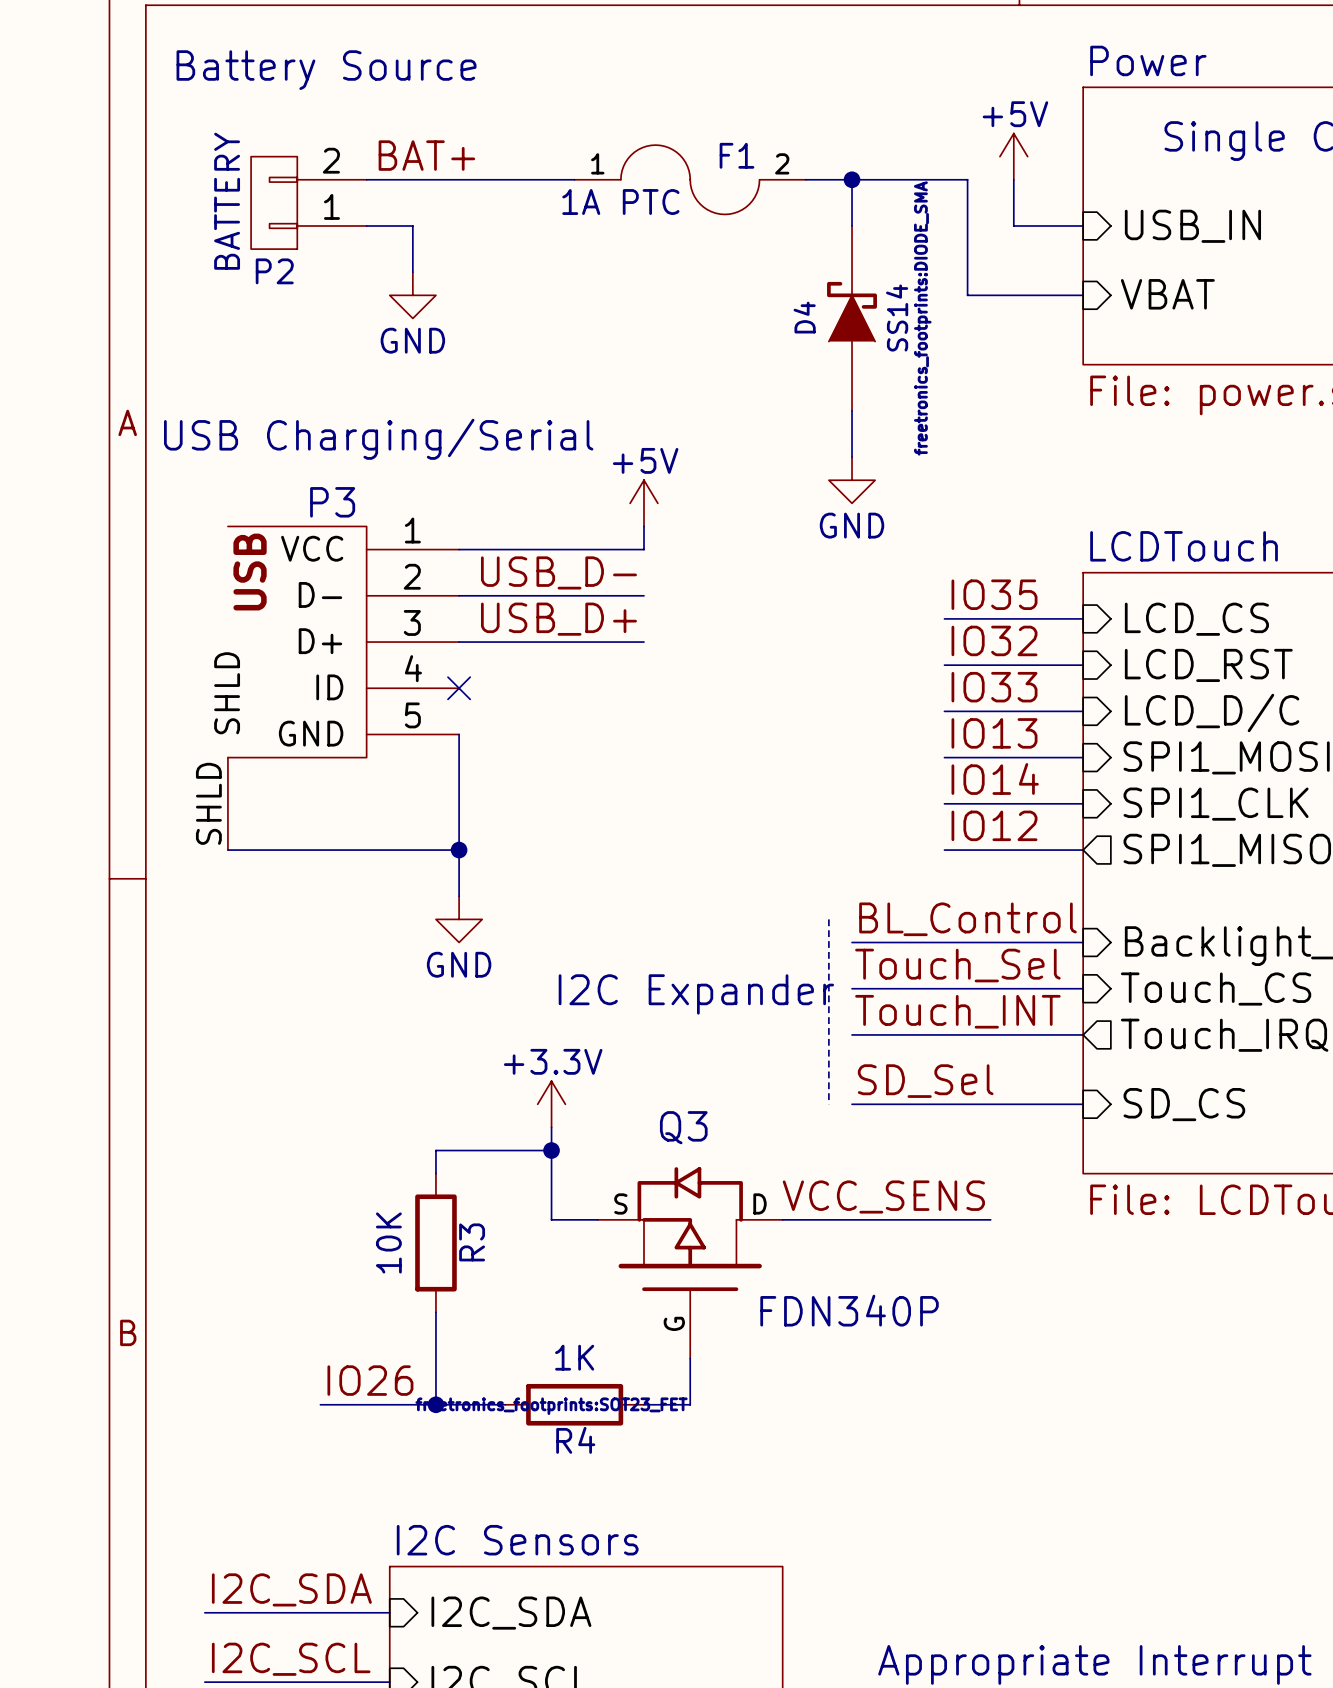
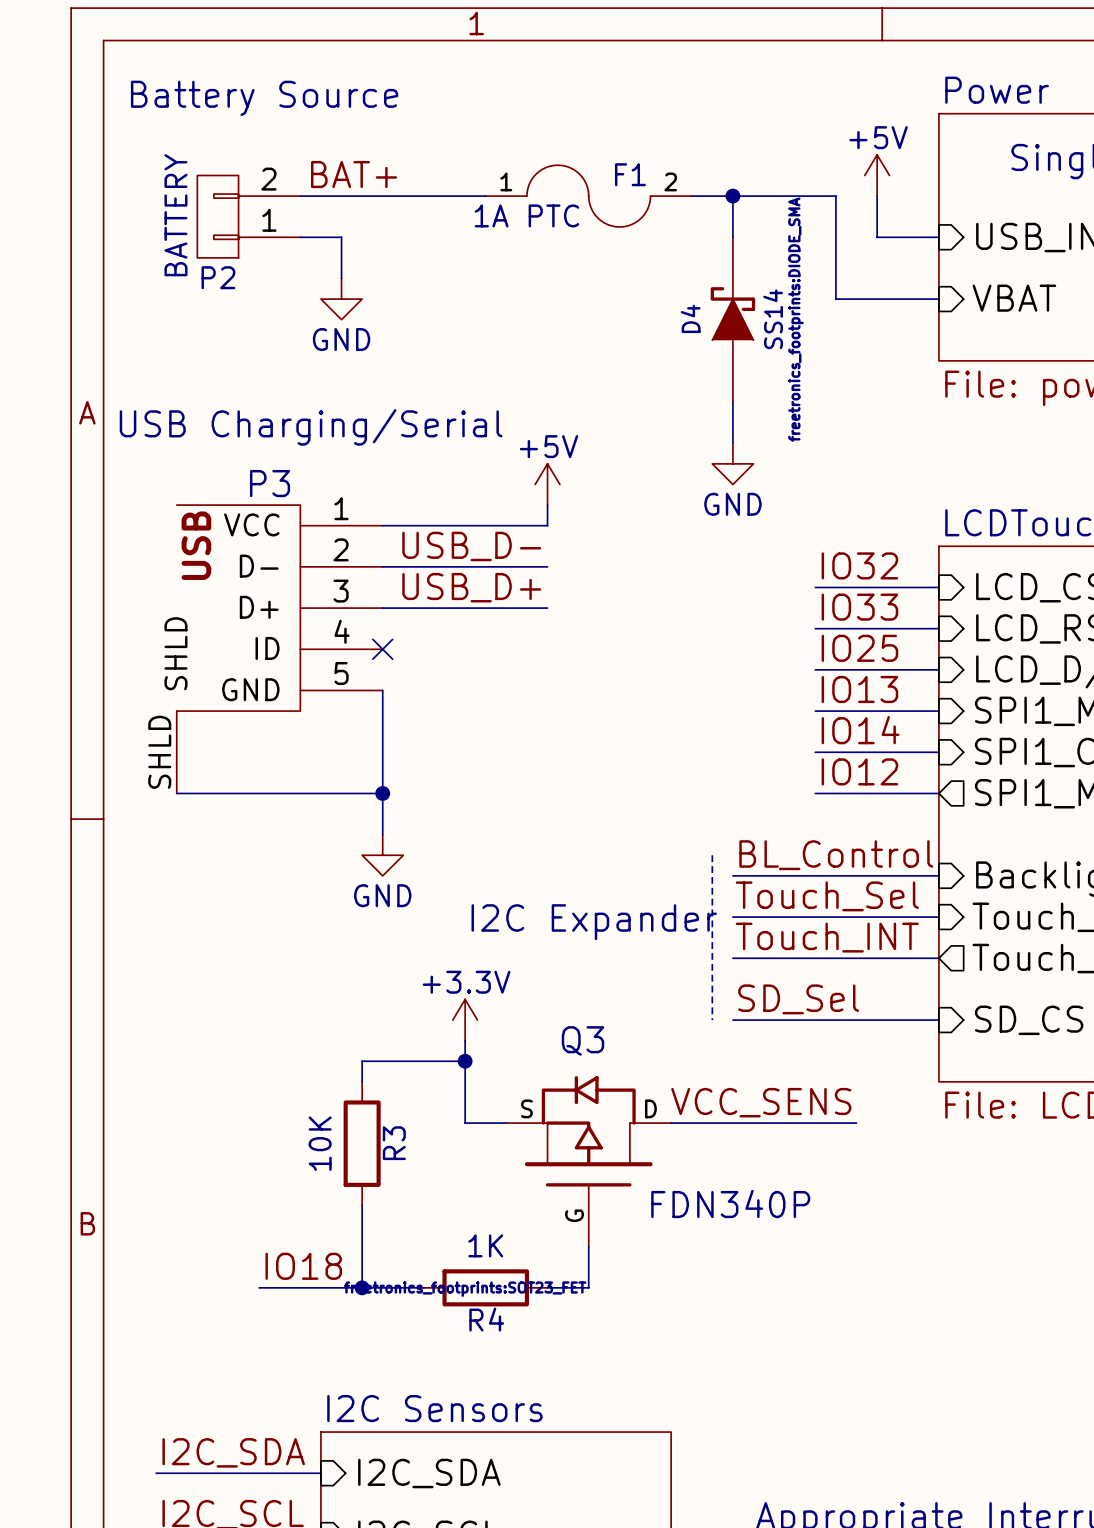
label: IO35 (994, 594) -> IO32 (859, 565)
label: IO32 (994, 640) -> IO33 (859, 607)
label: IO33 (994, 687) -> IO25 (859, 648)
label: IO26 (370, 1380) -> IO18 (303, 1266)

